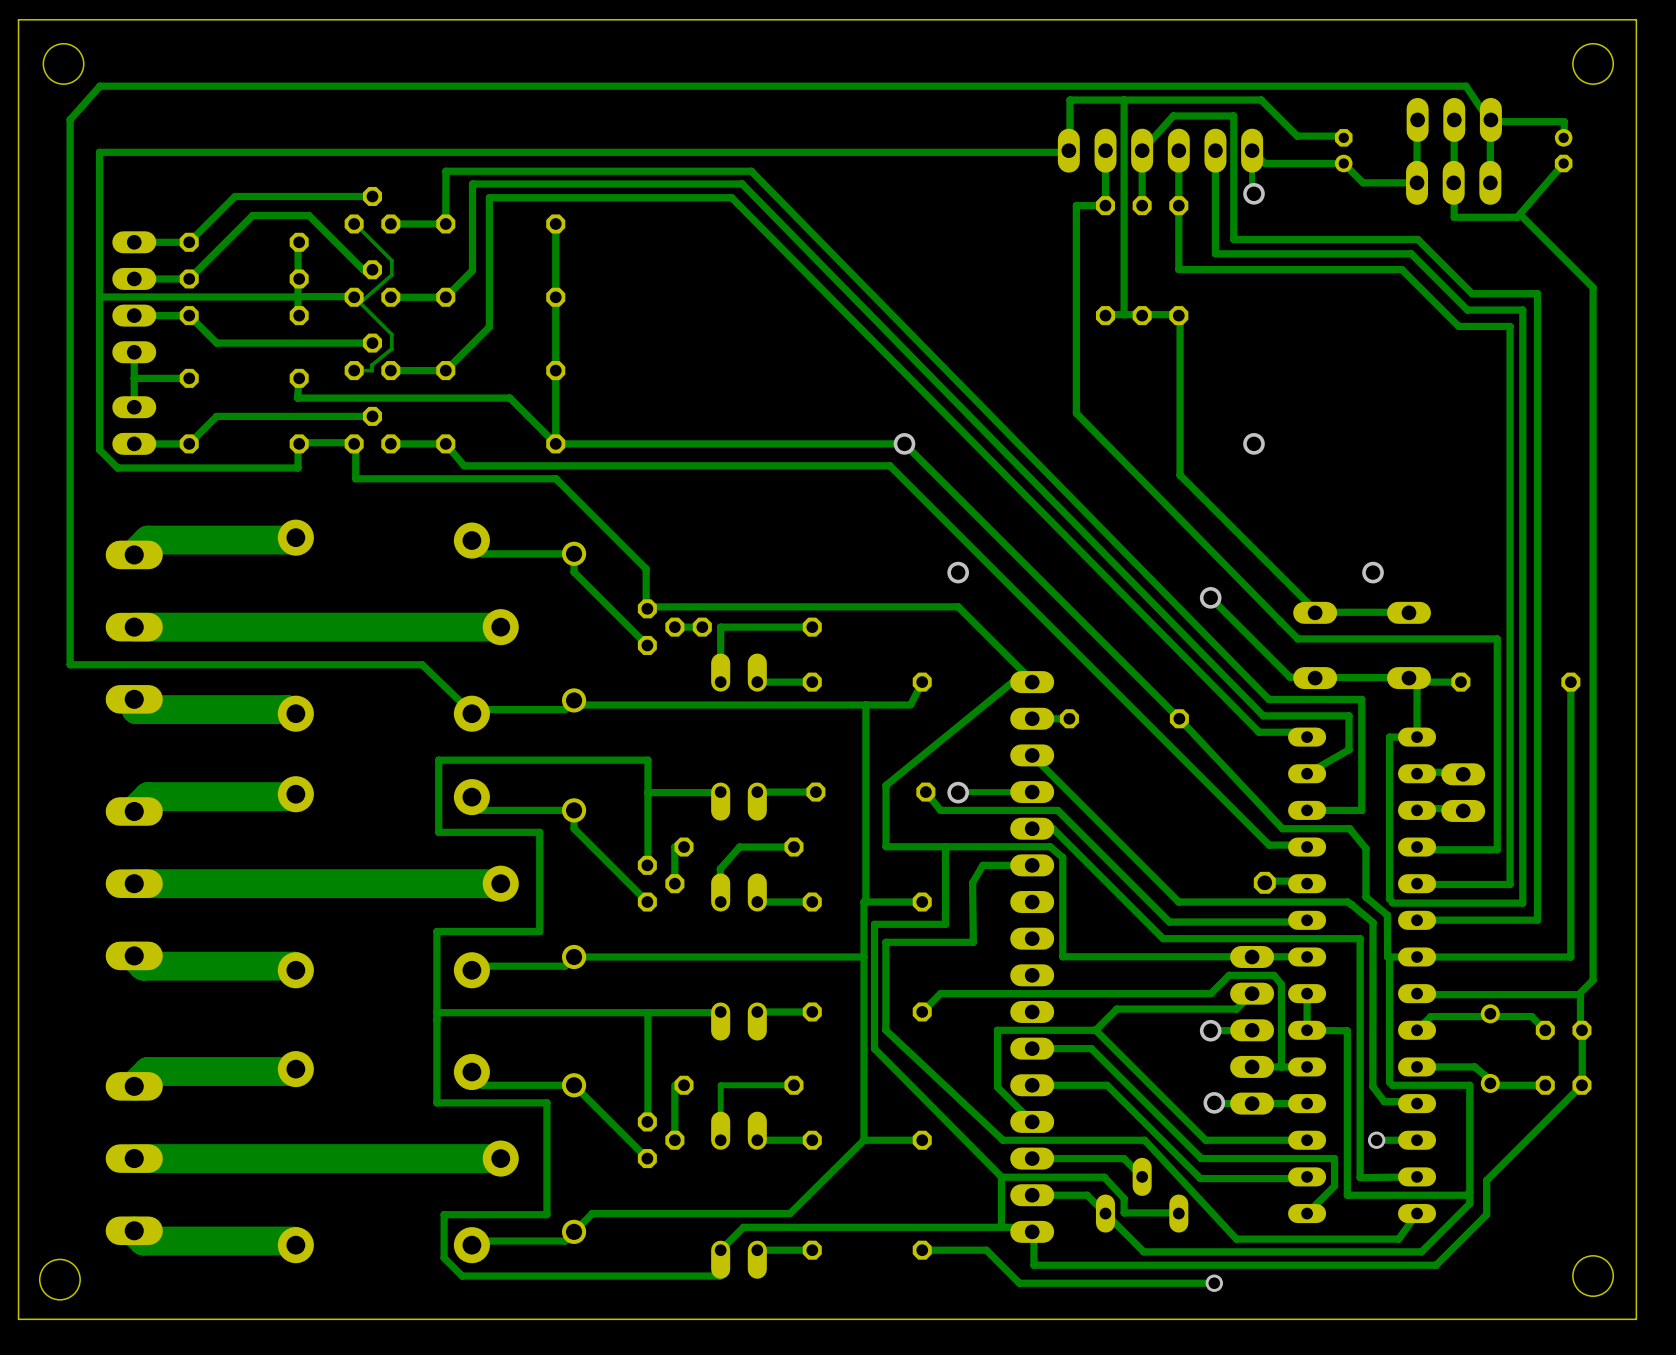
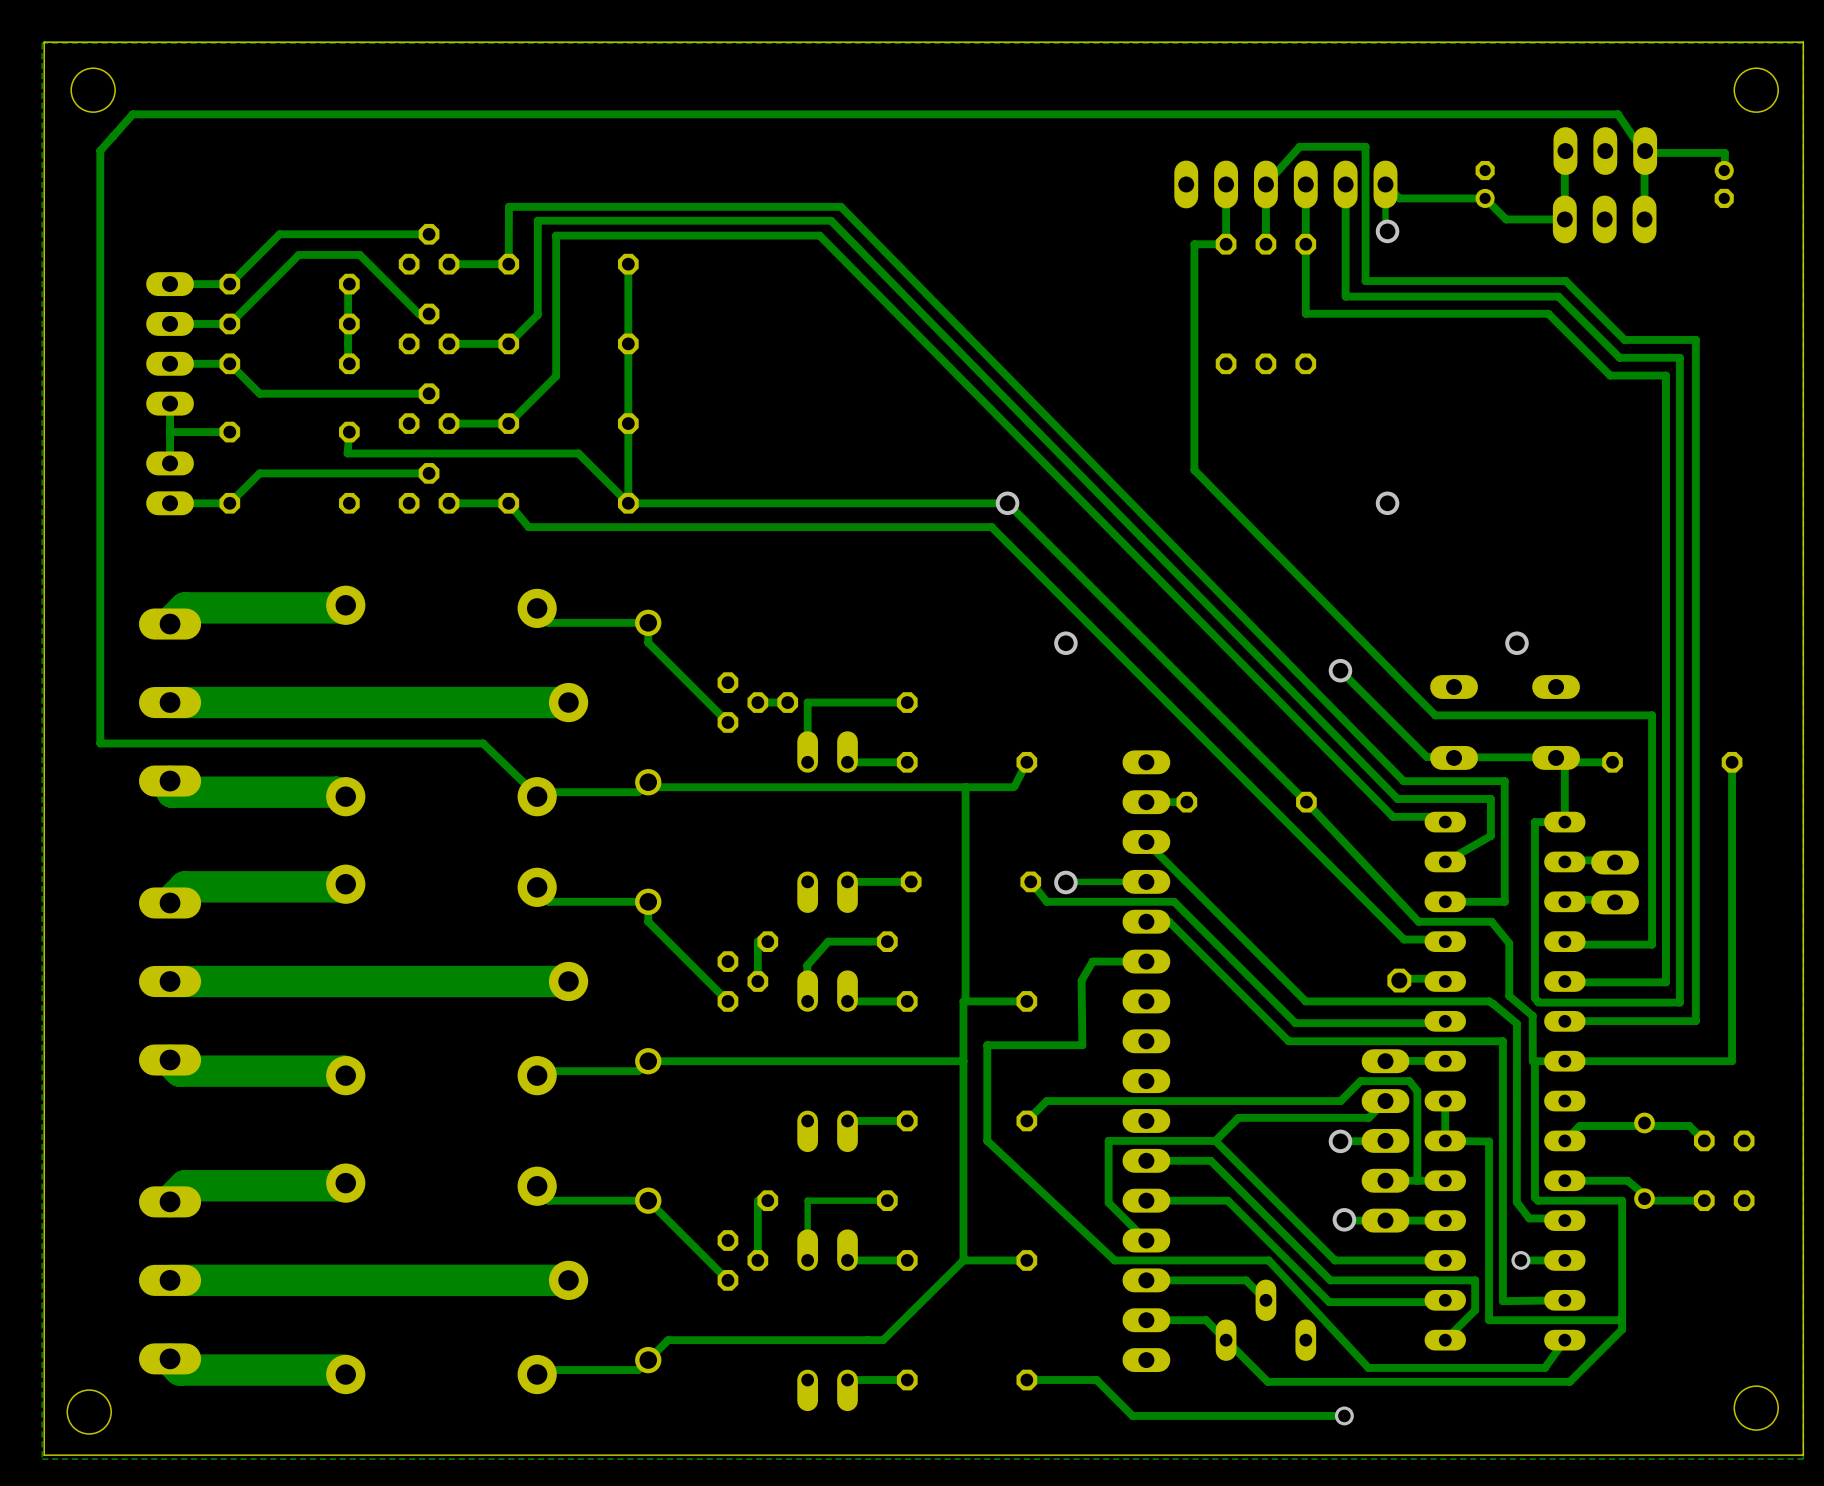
zone outline: none -> (1803, 43) (42, 43) (42, 1459) (1803, 1459) (1803, 43)
track: (1124, 100) (1124, 314) -> none
track: (1454, 119) (1454, 217) (1517, 217) -> none
track: (1343, 137) (1342, 136) (1297, 136) (1261, 100) (1070, 100) (1070, 150) (1068, 152) (99, 152) (99, 449) (117, 467) (298, 467) (298, 444) (299, 442) (353, 442) (355, 444) (355, 478) (555, 478) (646, 568) (646, 608) (647, 606) (958, 606) (1032, 682) (1023, 673) (886, 785) (886, 846) (1050, 846) (1062, 857) (1062, 956) (1252, 956) -> none
track: (1563, 163) (1517, 217) -> none
track: (1517, 217) (1520, 215) (1593, 287) (1593, 980) (1580, 994) -> none
track: (361, 228) (354, 223) (391, 260) (391, 274) (361, 302) (354, 297) -> none
track: (99, 296) (354, 297) -> none
track: (354, 297) (391, 334) (391, 348) (371, 365) (371, 370) (354, 370) -> none
track: (1105, 315) (1178, 314) (1180, 316) (1180, 475) (1315, 610) (1315, 612) (1408, 612) -> none
track: (720, 792) (647, 792) -> none
track: (945, 846) (945, 924) (874, 924) (874, 1048) (1001, 1177) -> none
track: (647, 866) (647, 760) (438, 760) (438, 832) (539, 832) (539, 931) (436, 931) (436, 1102) (546, 1102) (546, 1214) (444, 1214) (444, 1257) (462, 1276) (720, 1276) (720, 1250) (743, 1227) (1023, 1227) (1033, 1232) (1033, 1265) (1436, 1265) (1486, 1214) (1486, 1180) (1582, 1084) (1580, 994) -> none
track: (1417, 993) (1580, 994) -> none
track: (720, 1011) (436, 1012) (436, 1019) -> none
track: (647, 1012) (647, 1122) -> none
track: (1001, 1177) (1104, 1177) (1124, 1198) (1124, 1212) (1178, 1213) -> none
track: (1001, 1177) (1001, 1227) -> none

